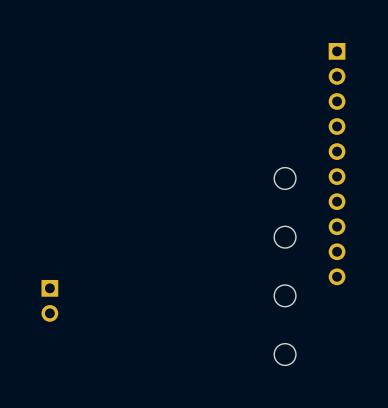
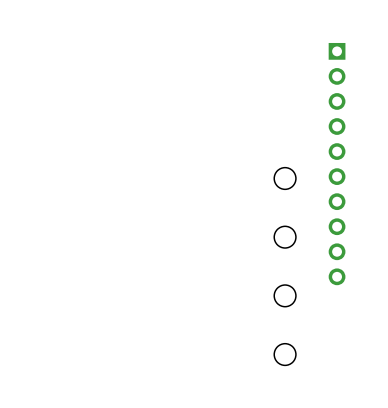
part: (49, 300) -> none

